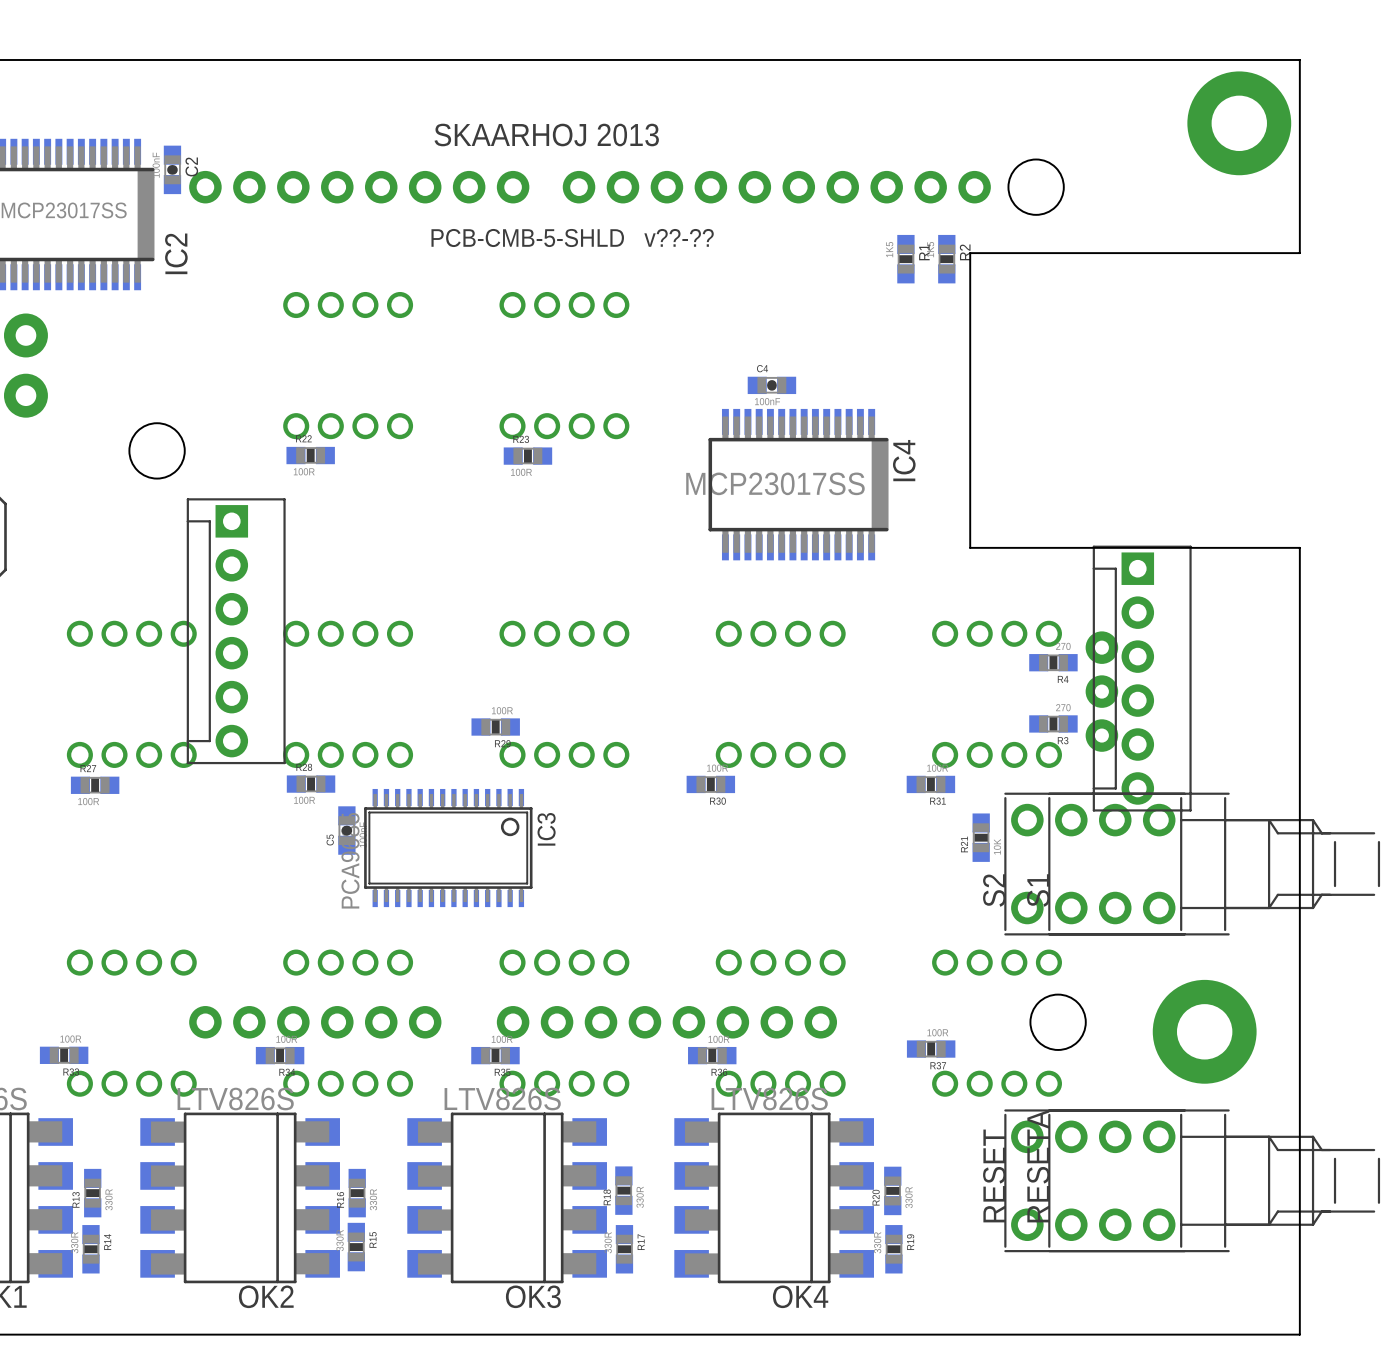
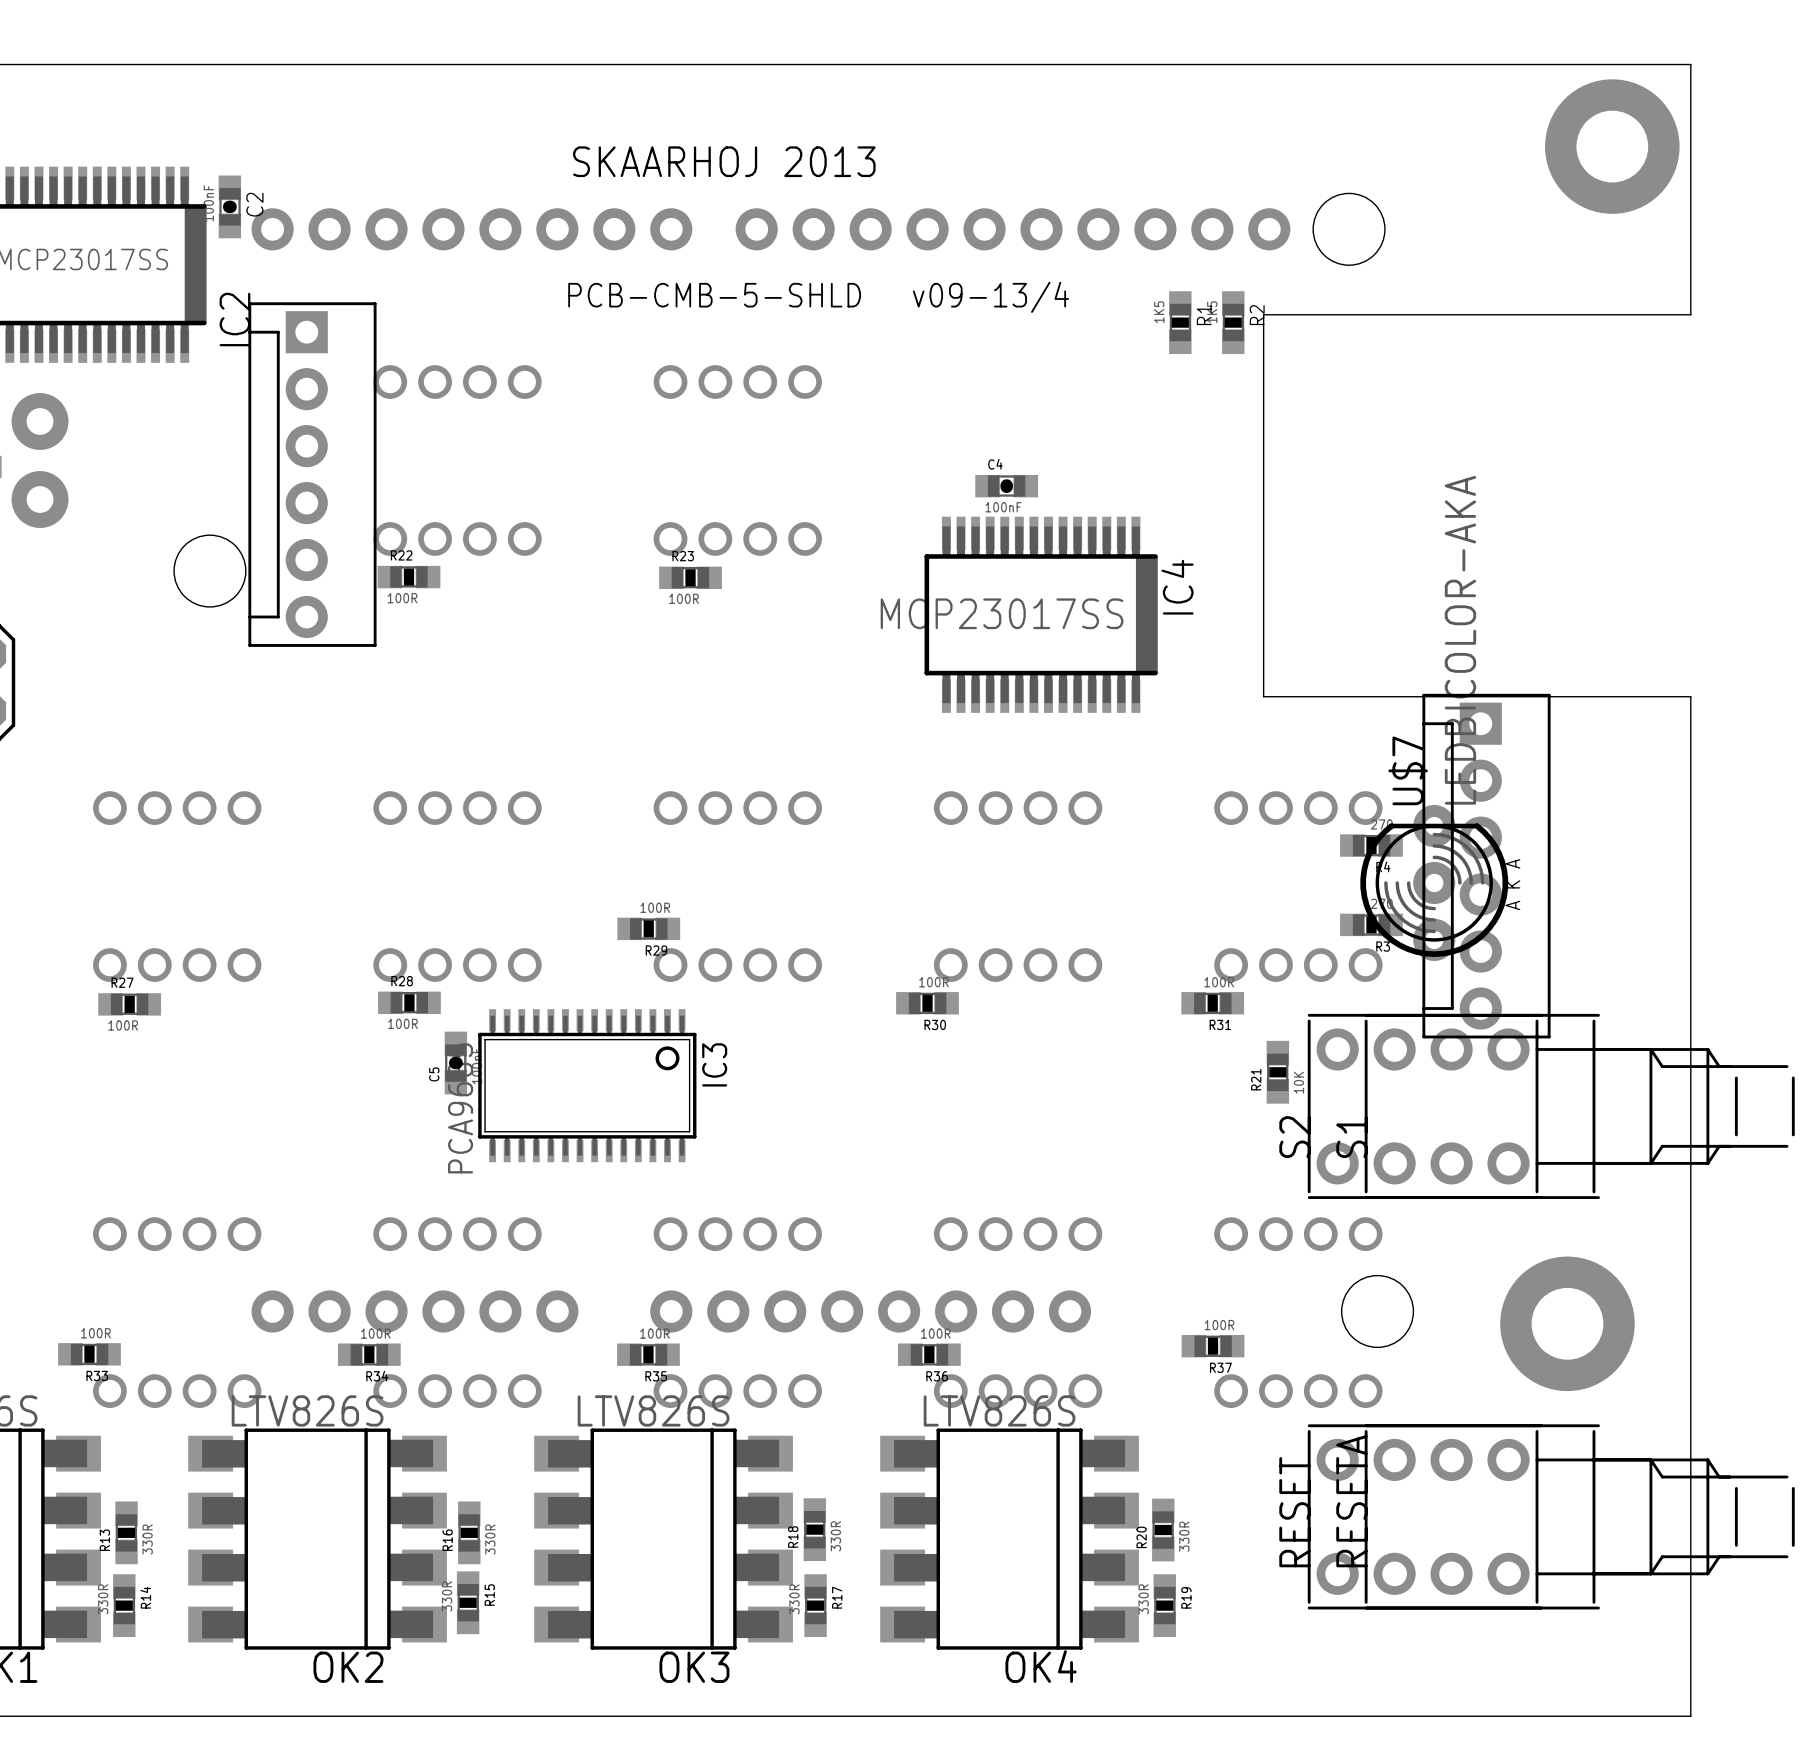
text: PCB-CMB-5-SHLD v??-?? (572, 237) -> PCB-CMB-5-SHLD v09-13/4 (818, 297)
part position: (236, 631) -> (312, 474)
U$7 side: top (1101, 691) -> bottom (1434, 882)

